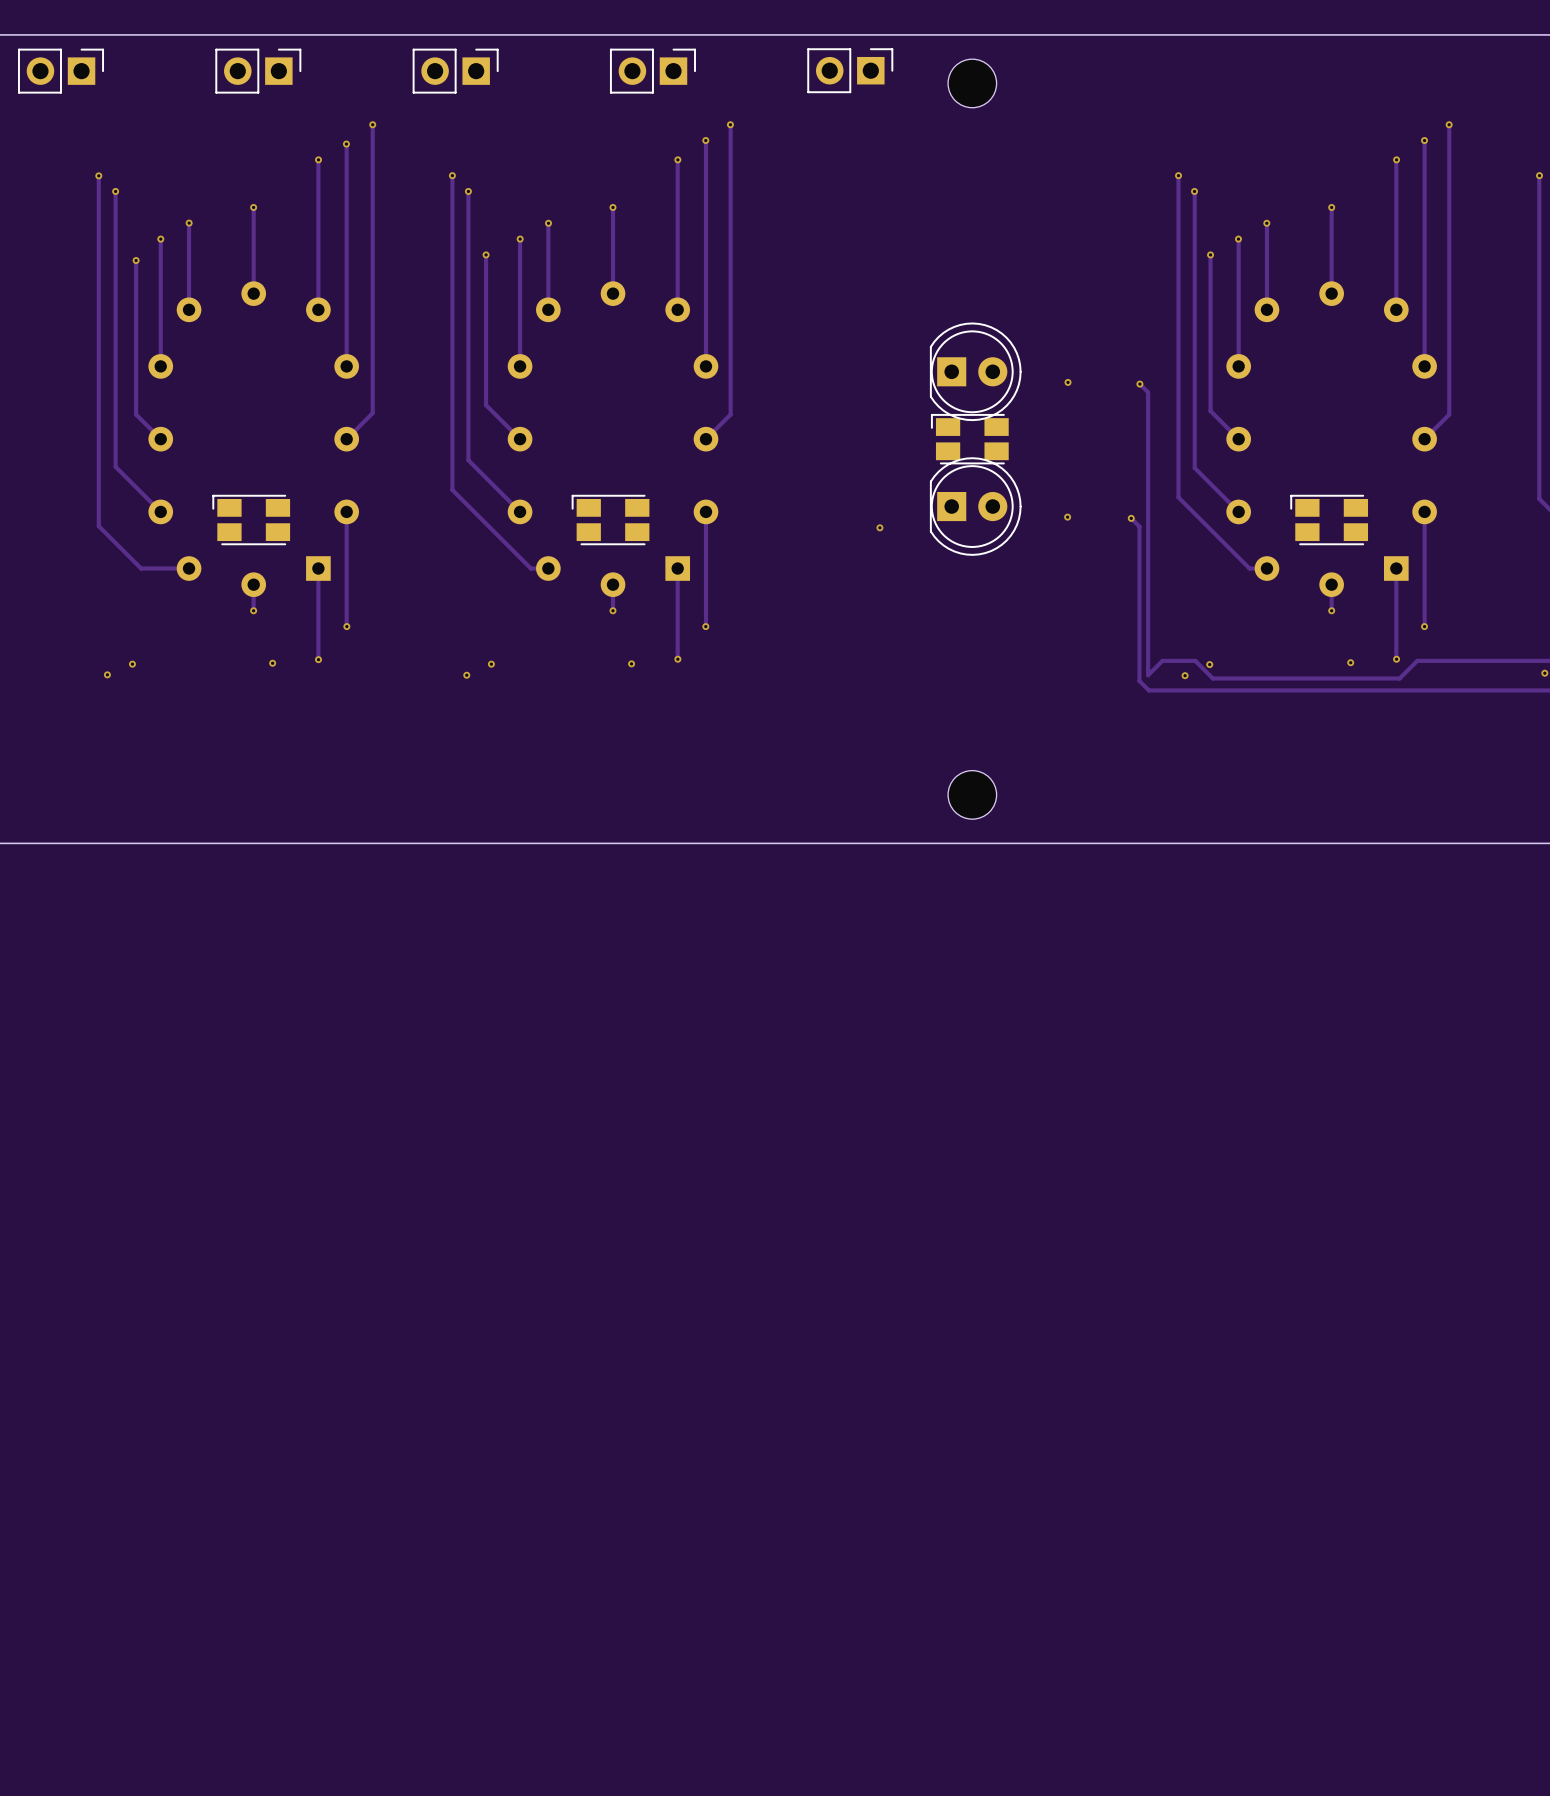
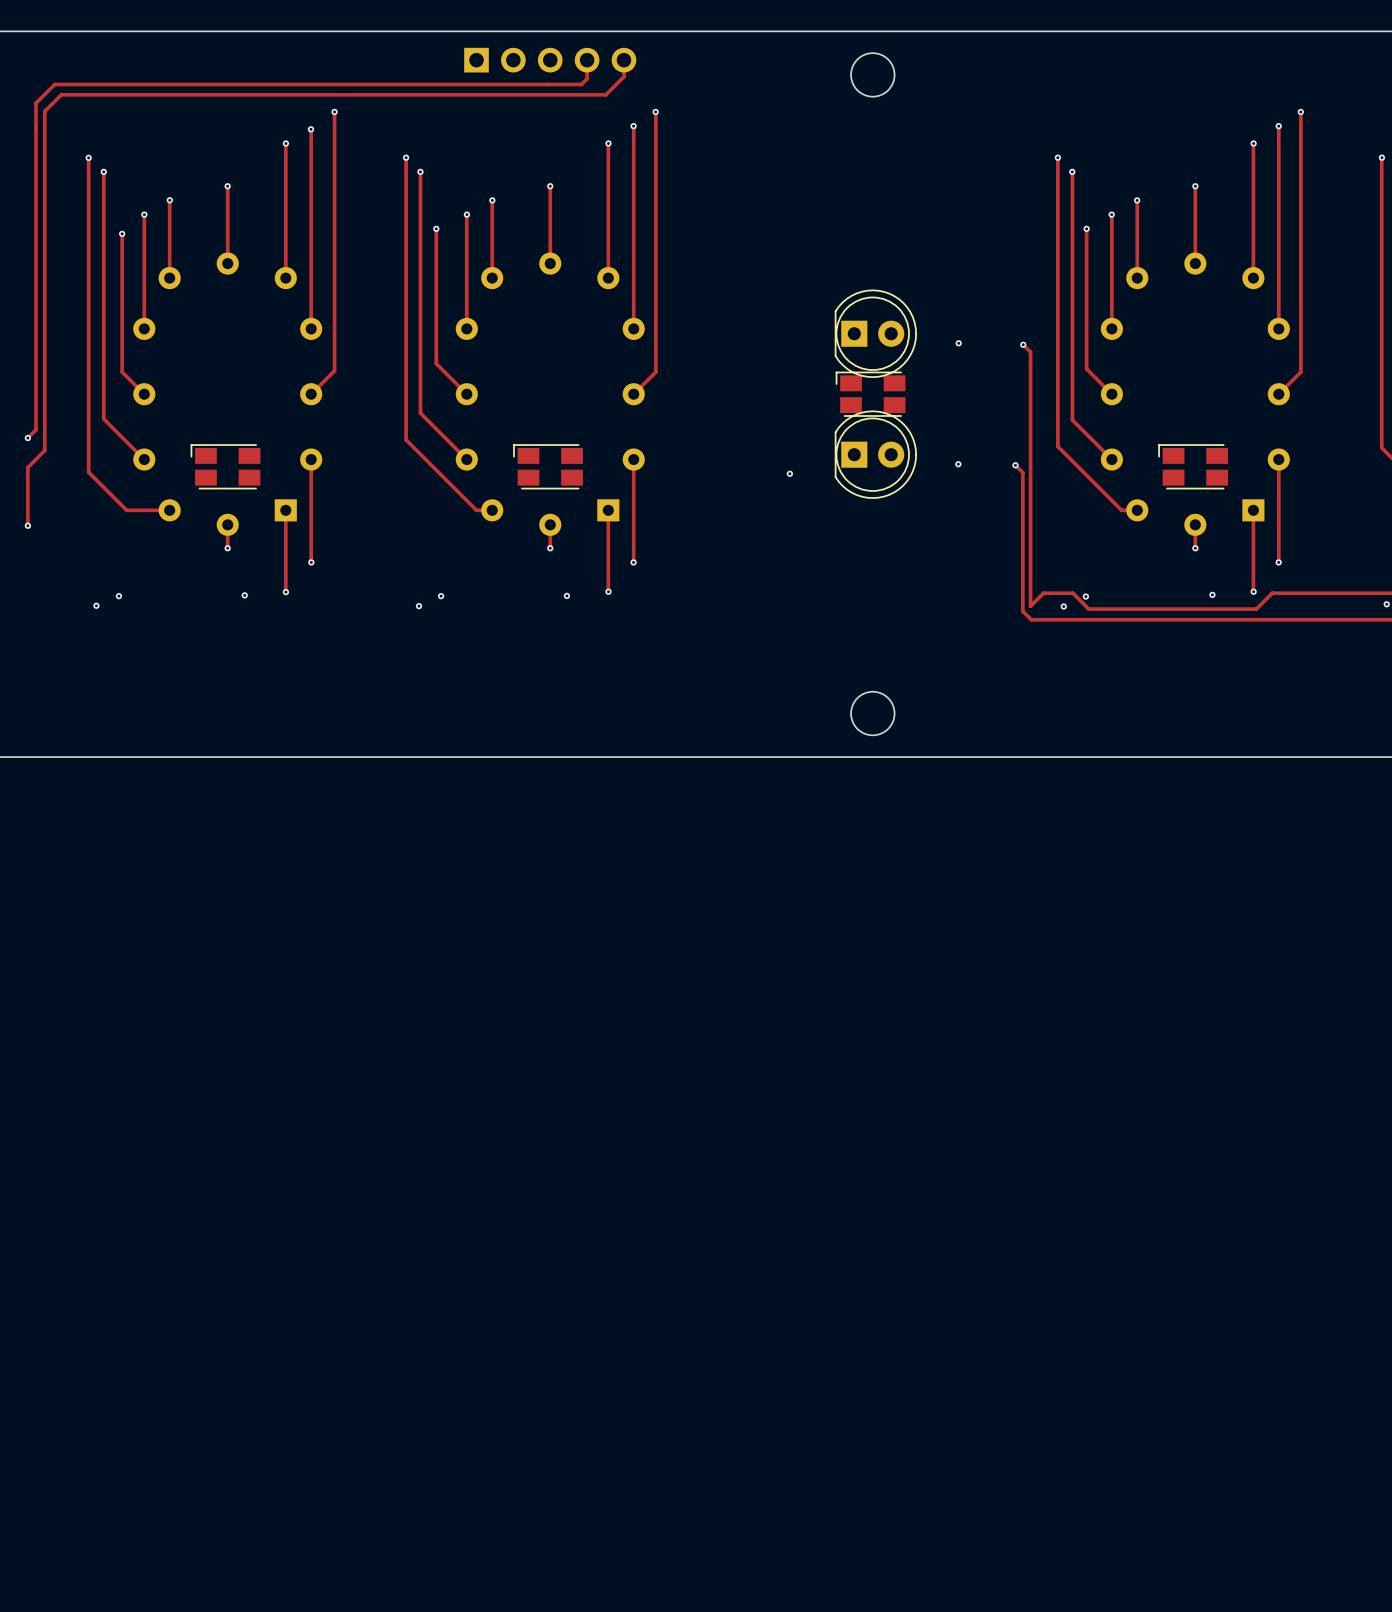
part: none -> (550, 60)
track: none -> (587, 60) (587, 78) (581, 84) (54, 84) (35, 103) (35, 429) (27, 438)
track: none -> (623, 60) (623, 76) (605, 94) (61, 94) (44, 111) (44, 450) (27, 467) (27, 525)
part: (850, 70) -> none
part: (61, 71) -> none
part: (258, 71) -> none
part: (455, 71) -> none
part: (652, 71) -> none
via: none -> (27, 438)
via: none -> (27, 525)

